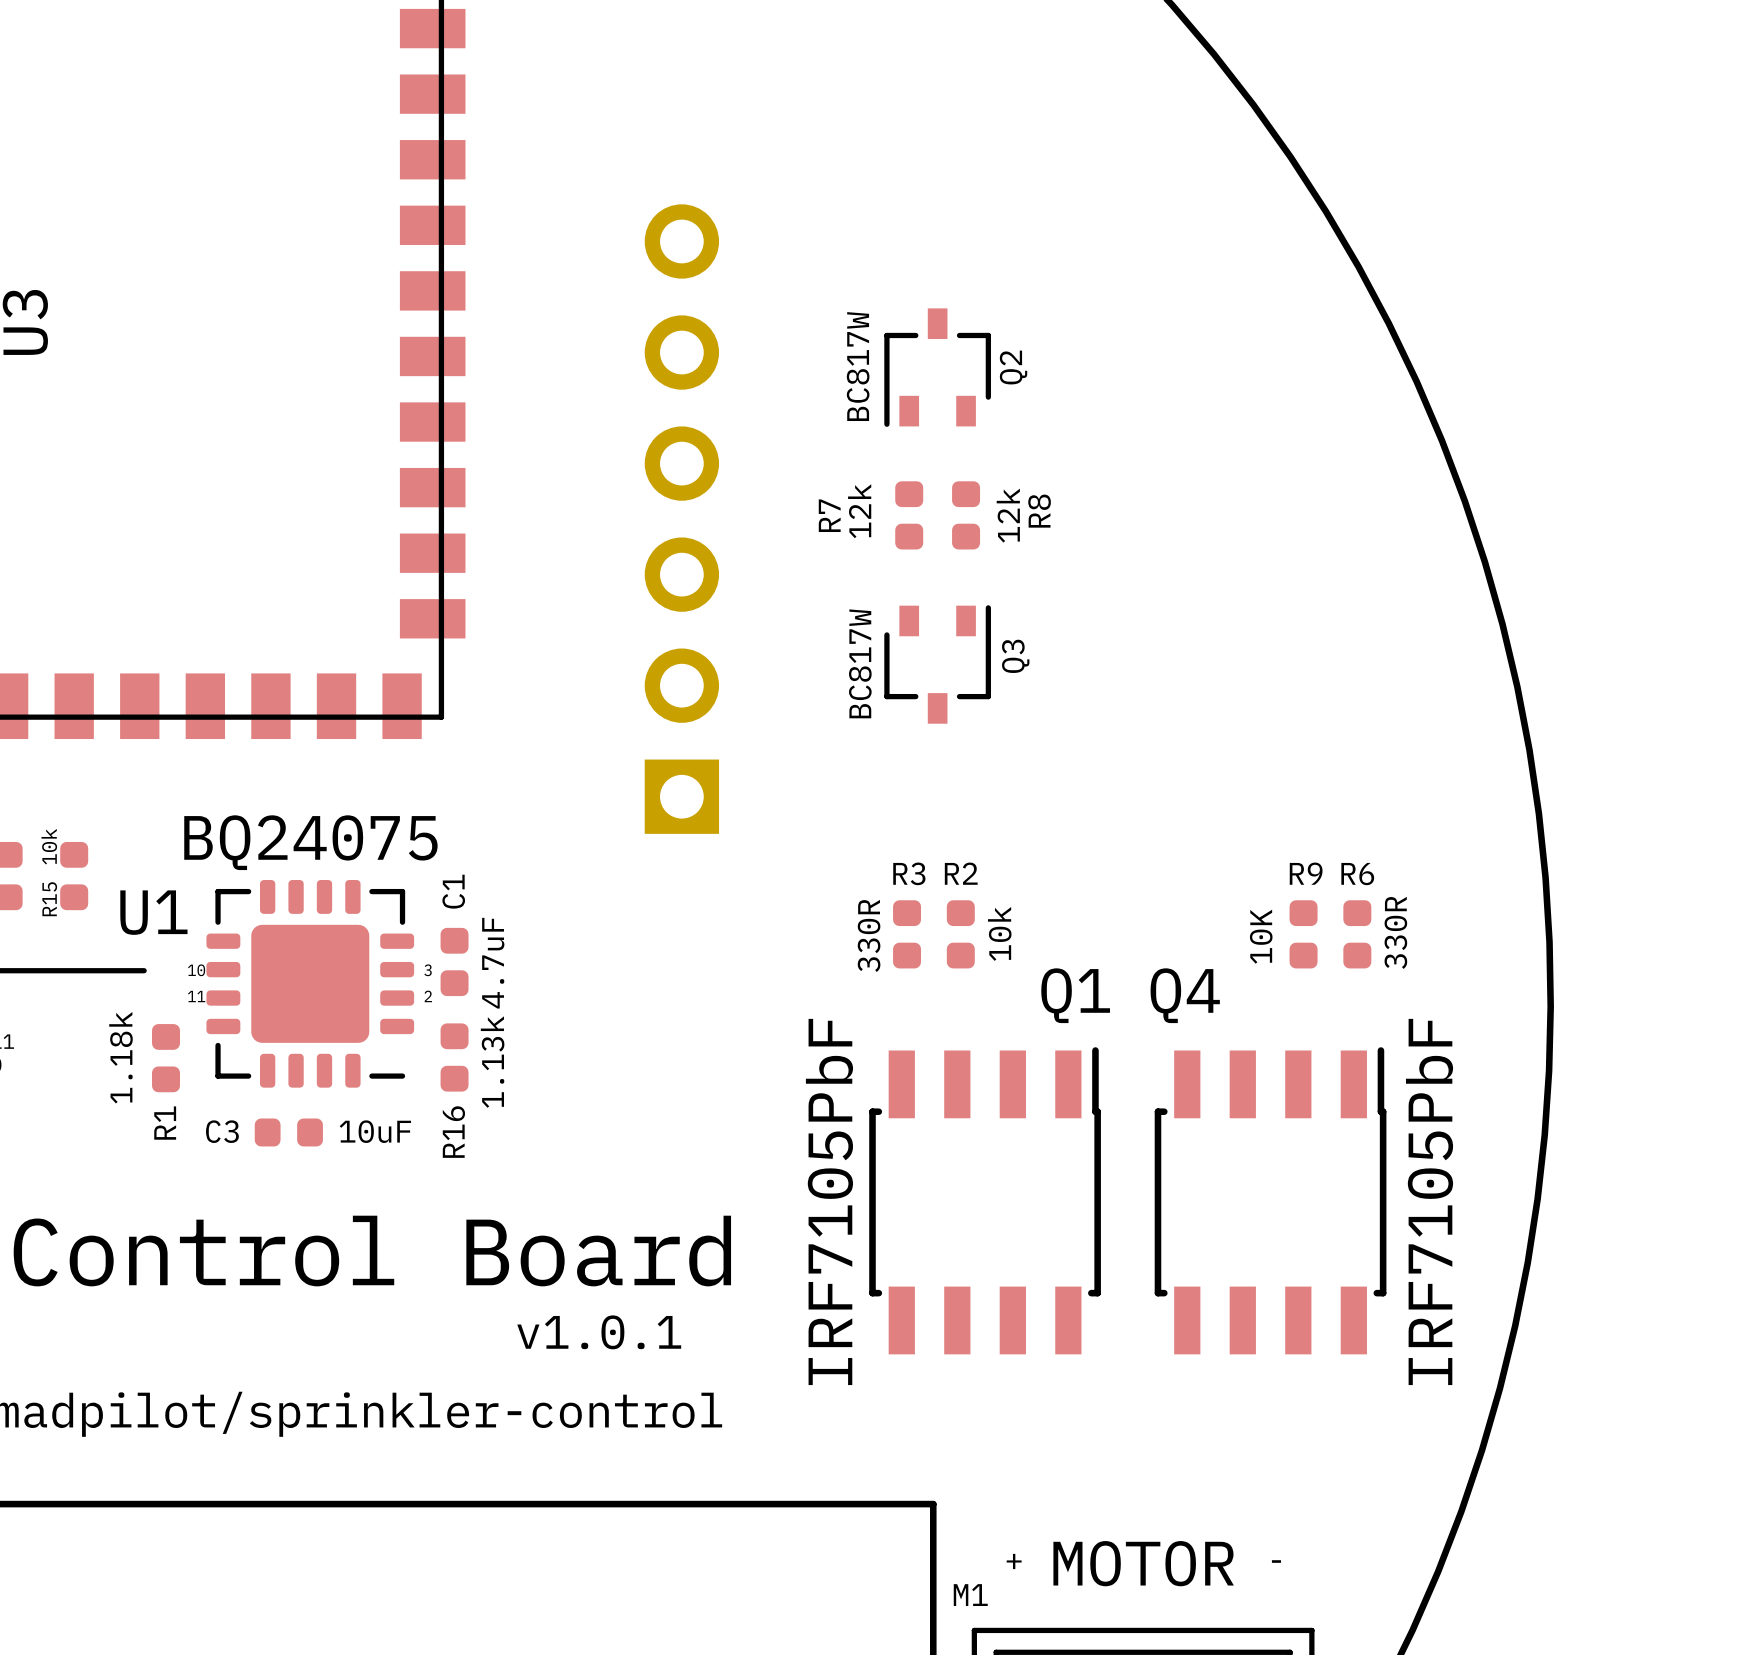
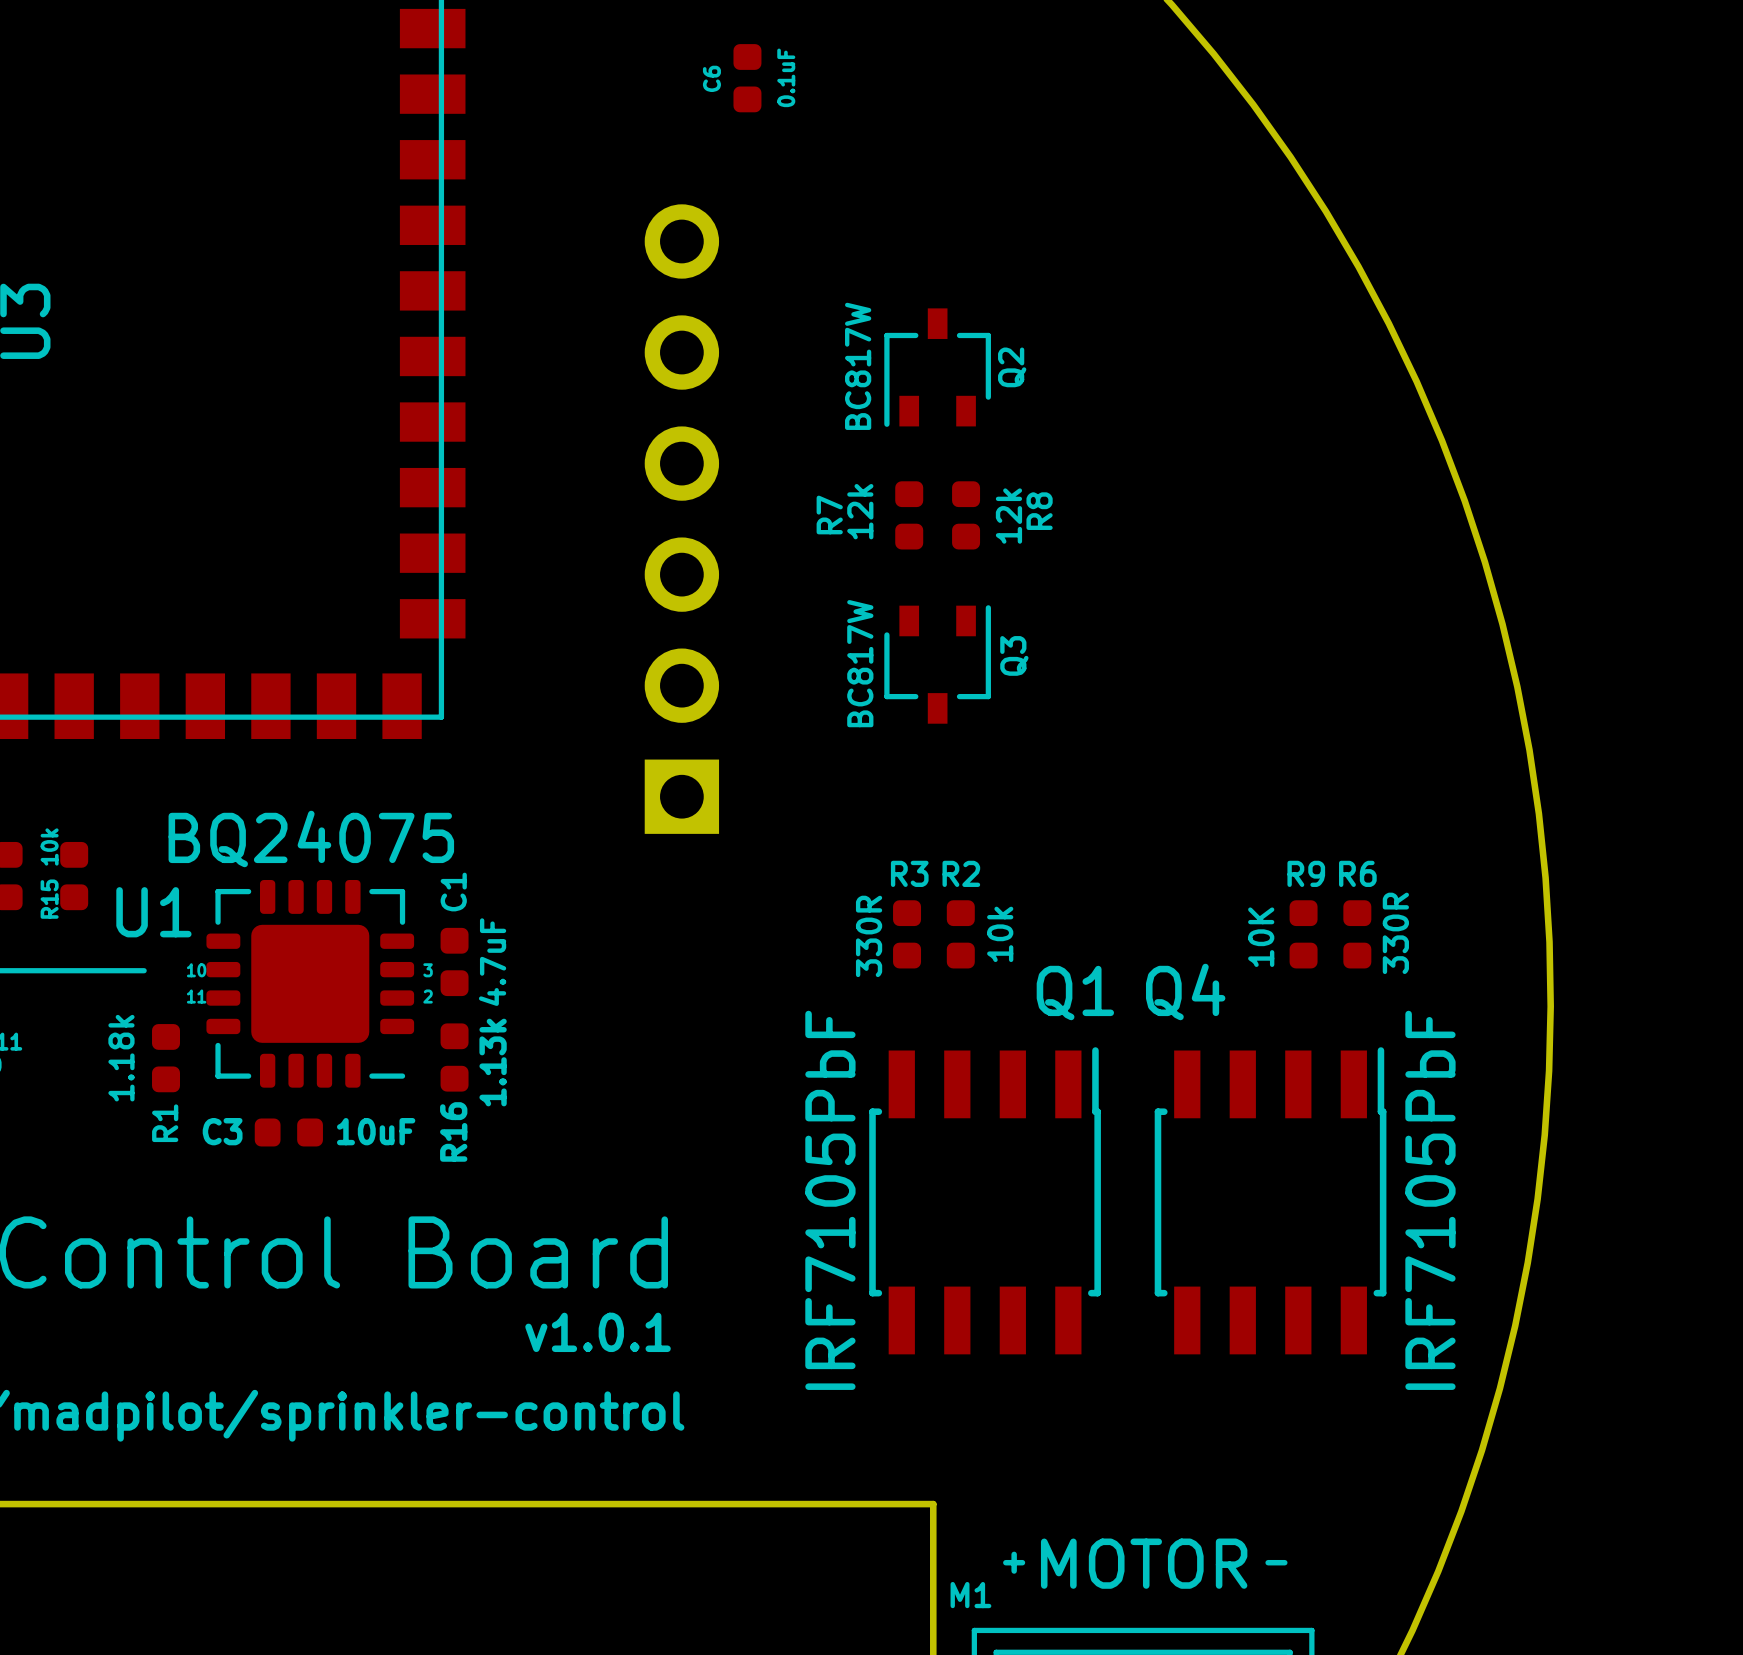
C6: none -> 0.1uF (747, 78)

